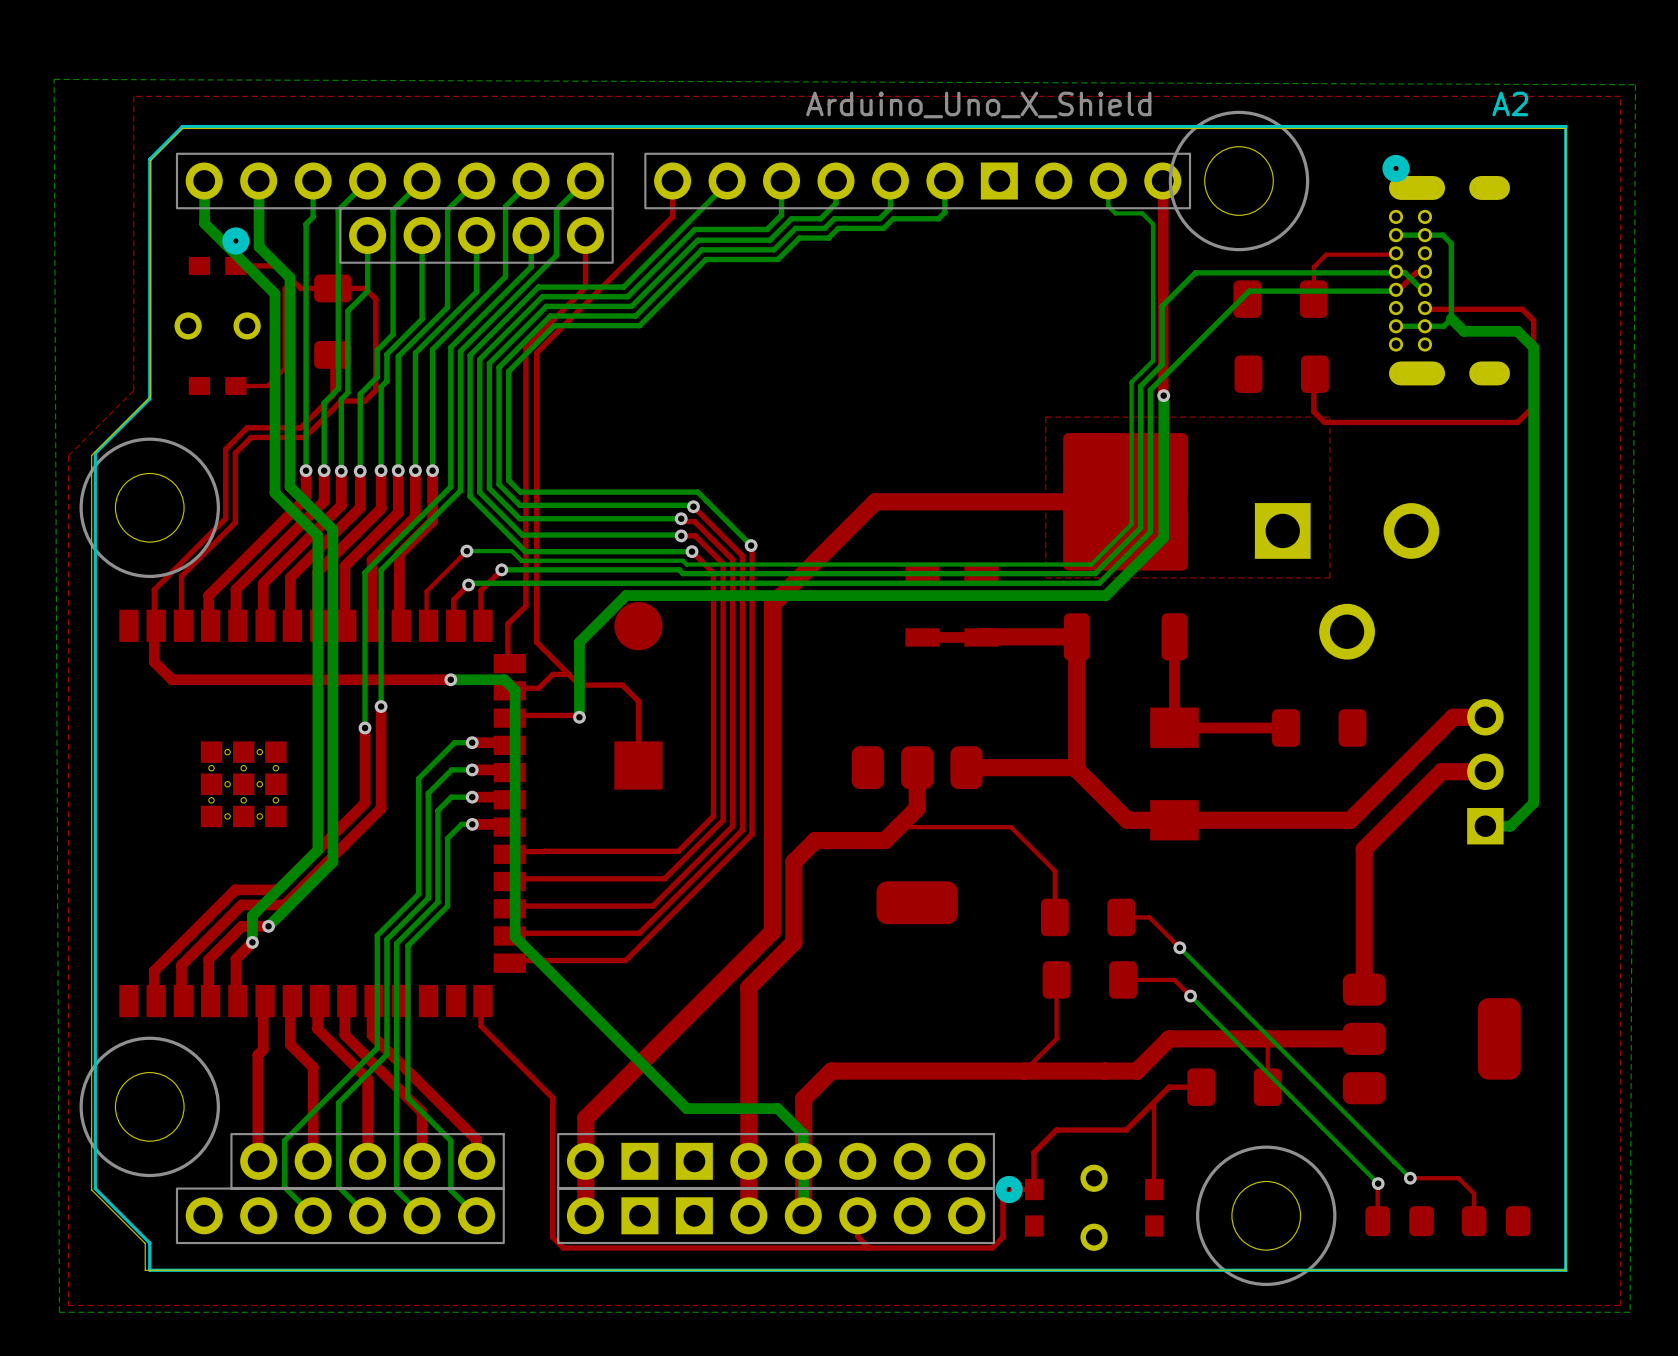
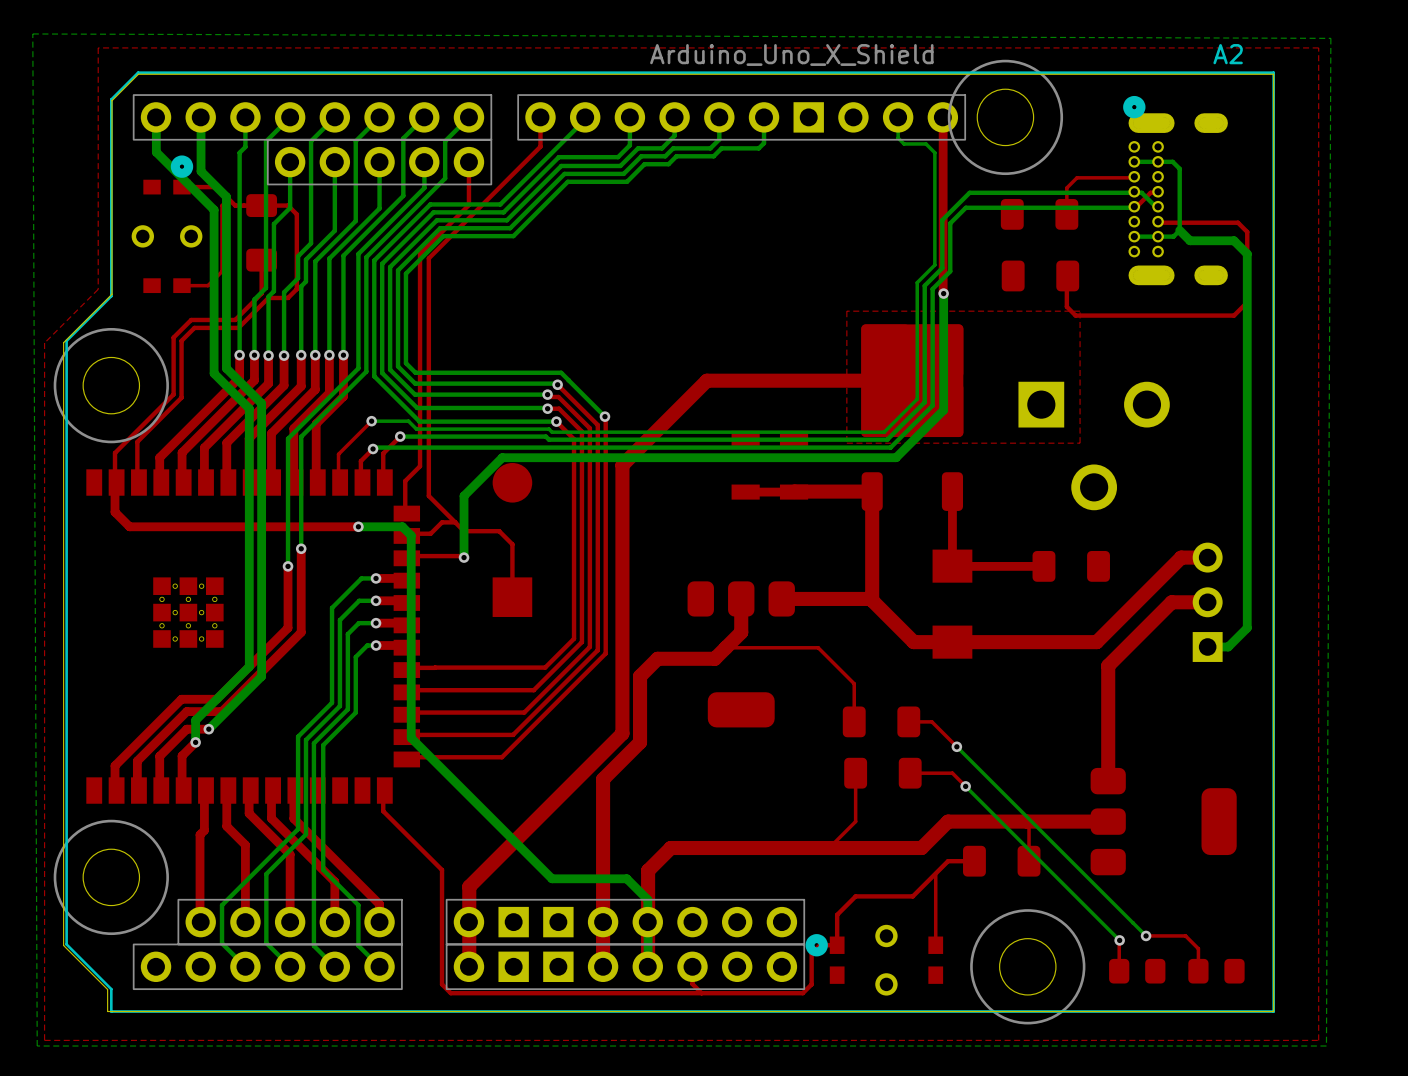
bottom track: (1249, 291) (1171, 368) -> (1013, 207) (965, 207) (950, 223) (950, 271)

